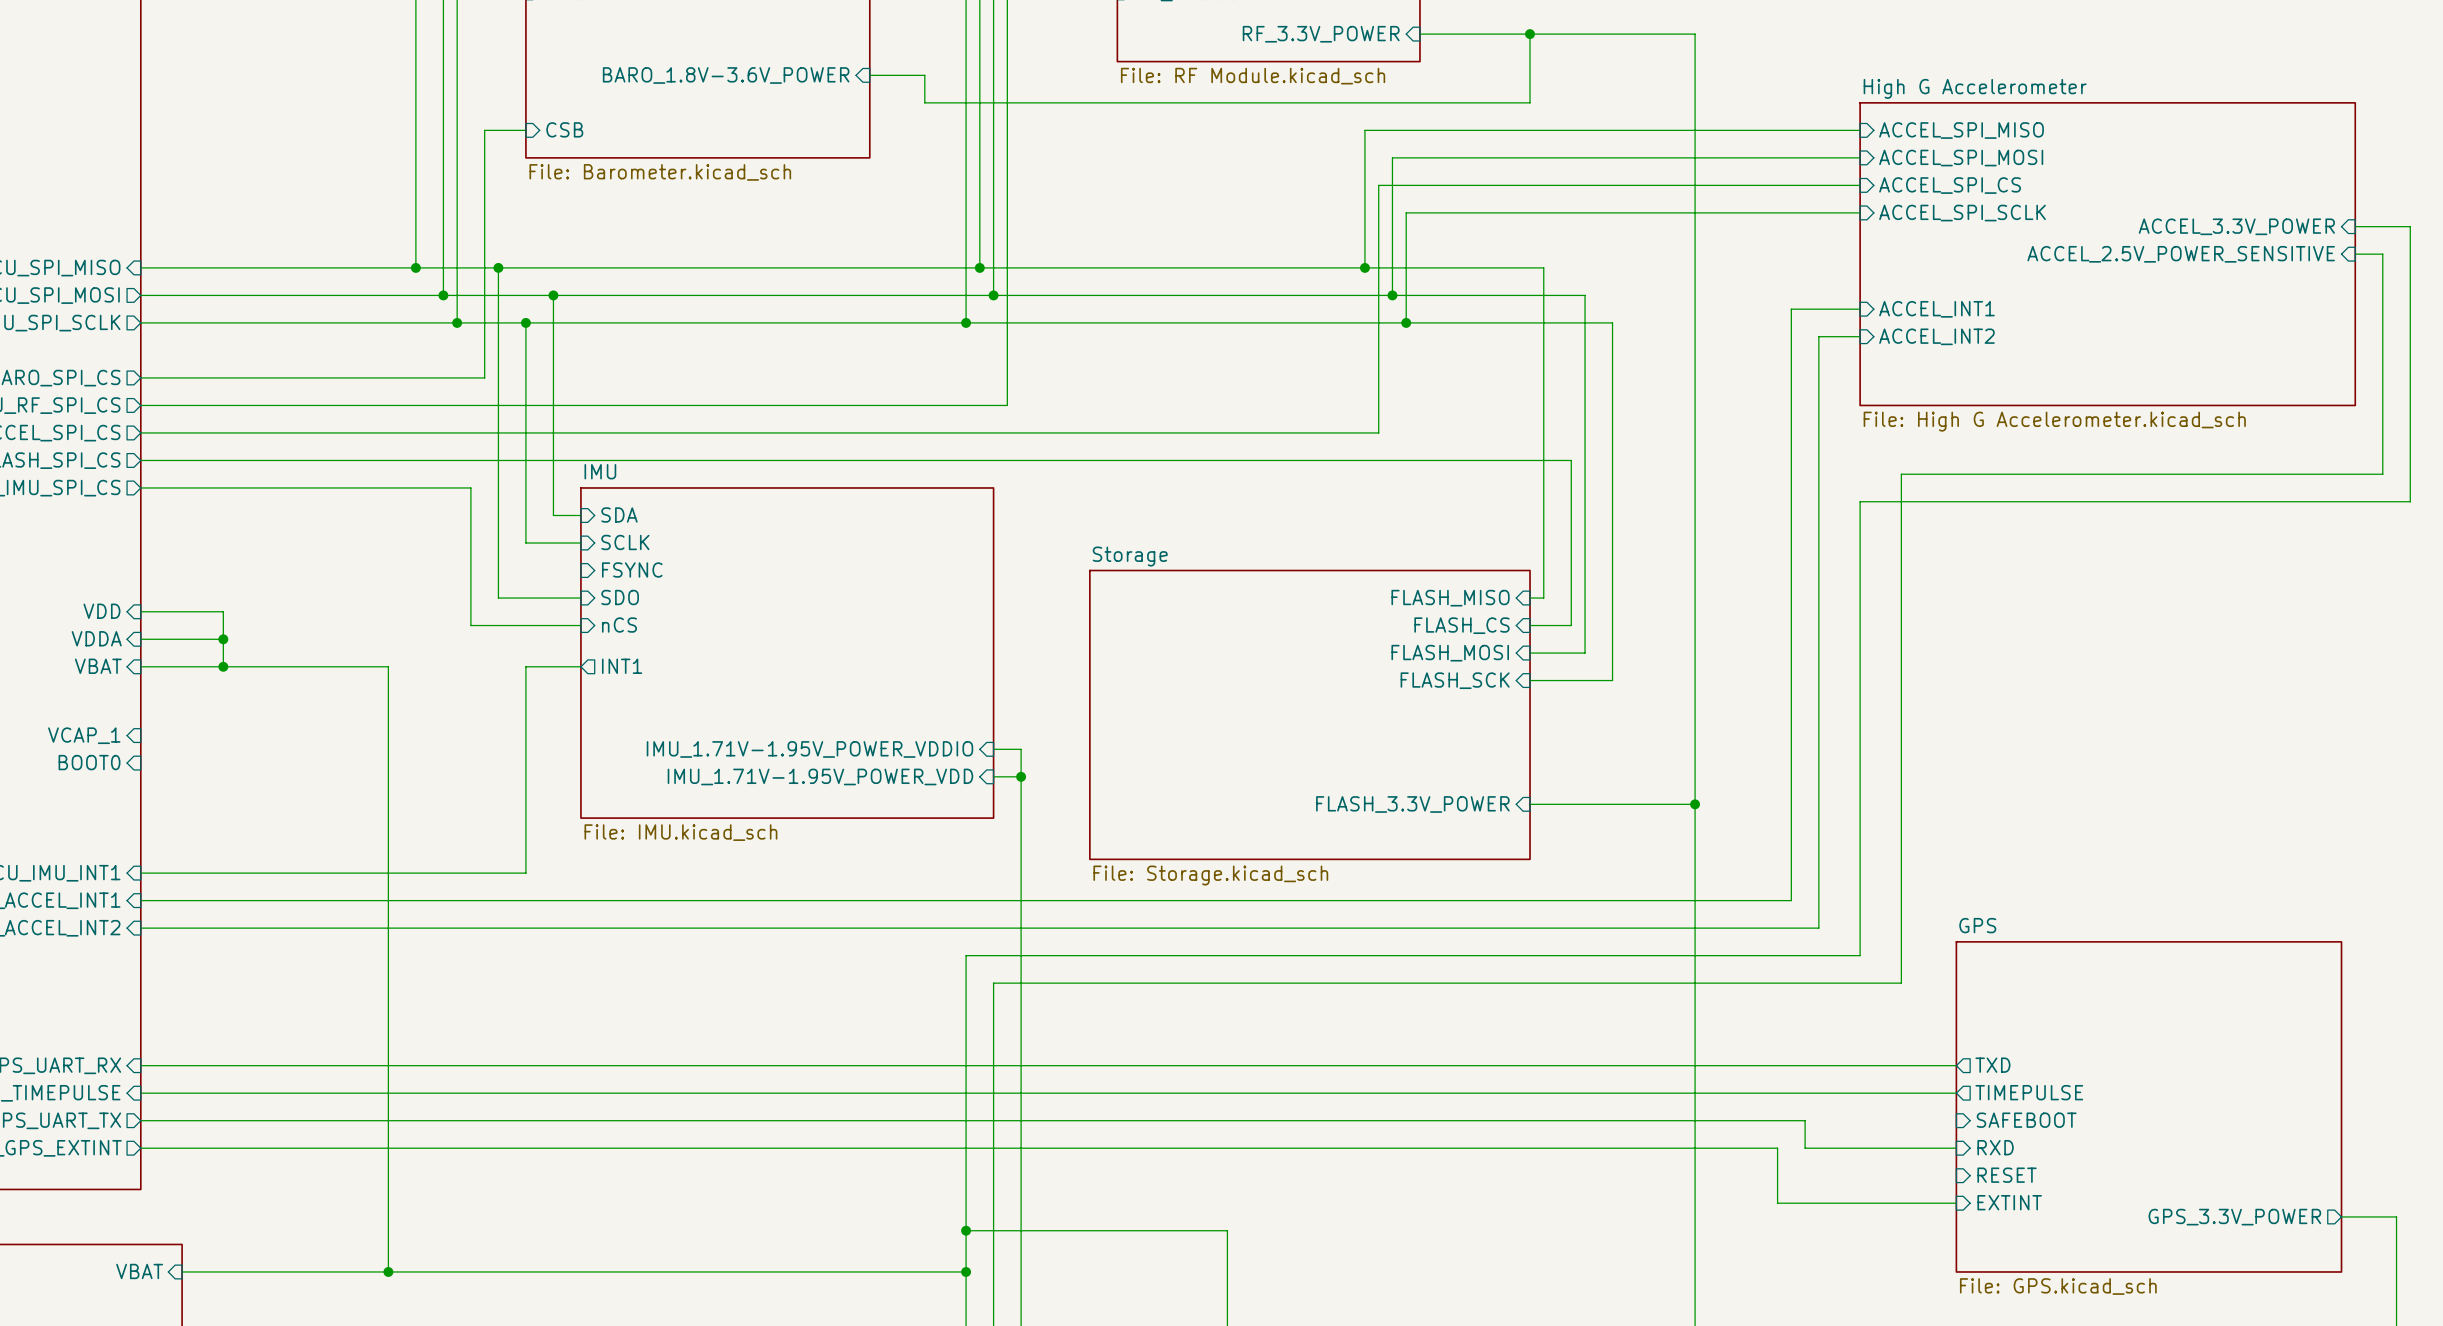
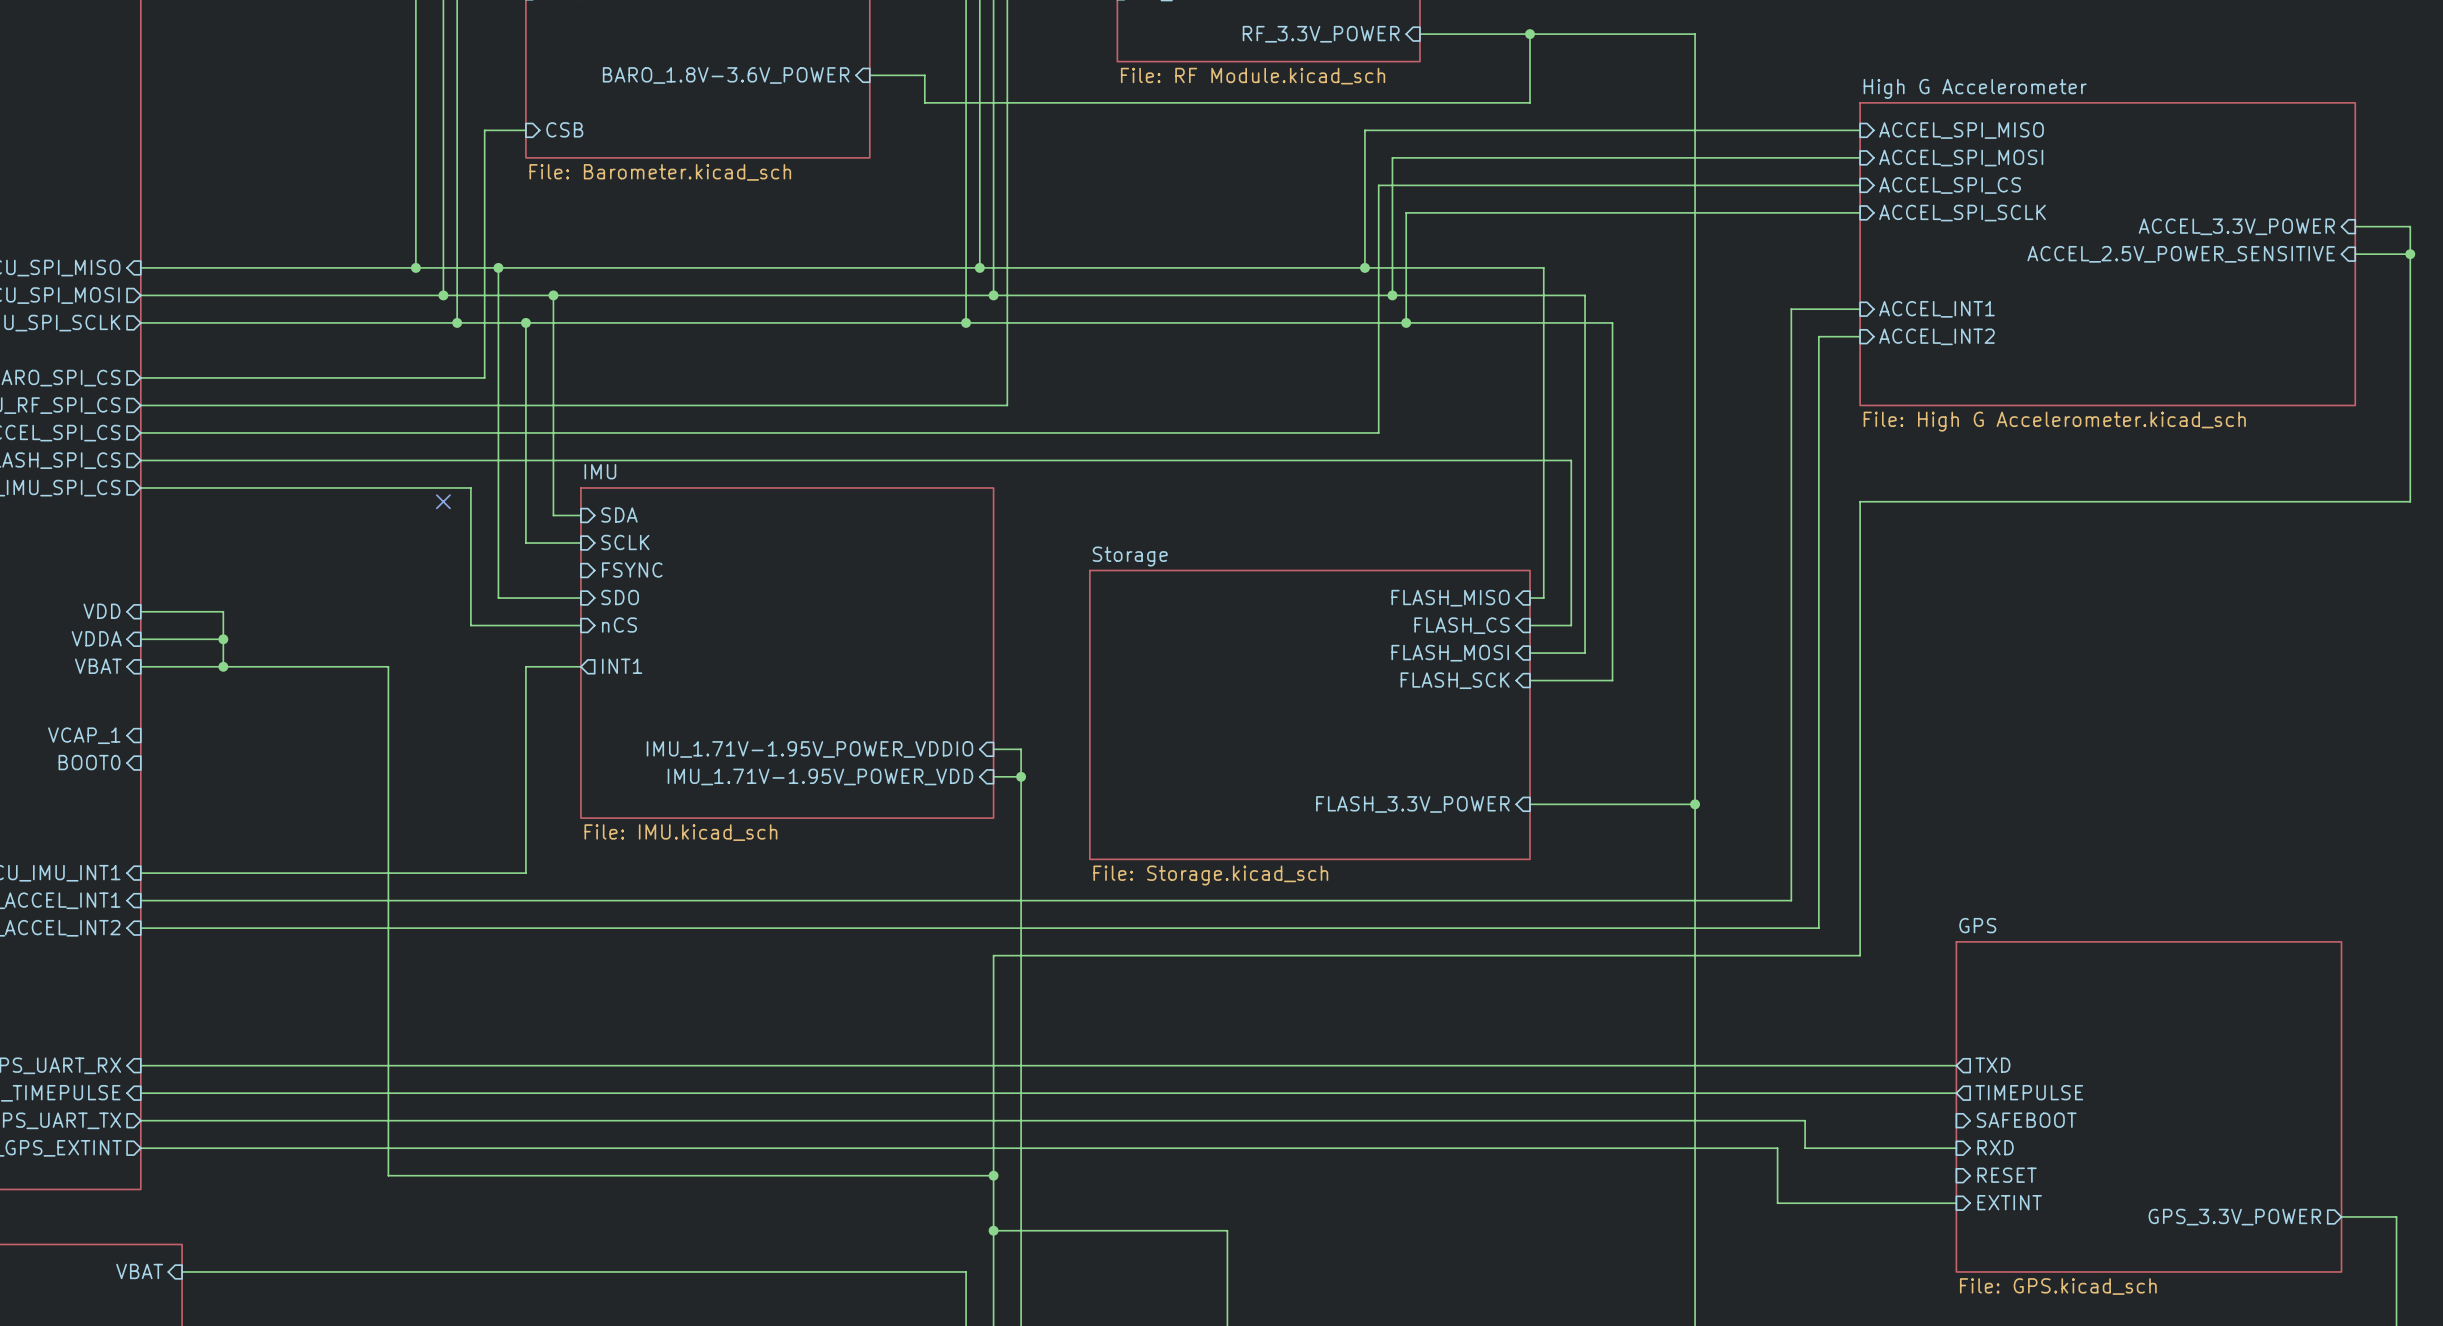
wire: (2382, 254) (2382, 474) (1901, 474) (1901, 983) (993, 983) -> (2382, 254) (2410, 254)
junction: none -> (2410, 254)
no-connect mark: none -> (443, 501)
wire: (993, 955) (966, 955) (966, 1271) -> (993, 955) (993, 983)
wire: (388, 1175) (388, 1271) -> (388, 1175) (993, 1175)
junction: none -> (993, 1175)
wire: (966, 1230) (993, 1230) -> none
junction: (966, 1230) -> none
junction: none -> (993, 1230)
junction: (388, 1271) -> none
junction: (966, 1271) -> none

